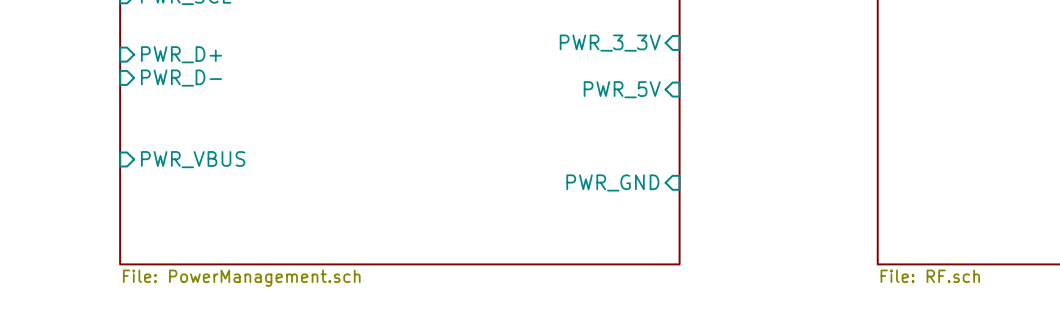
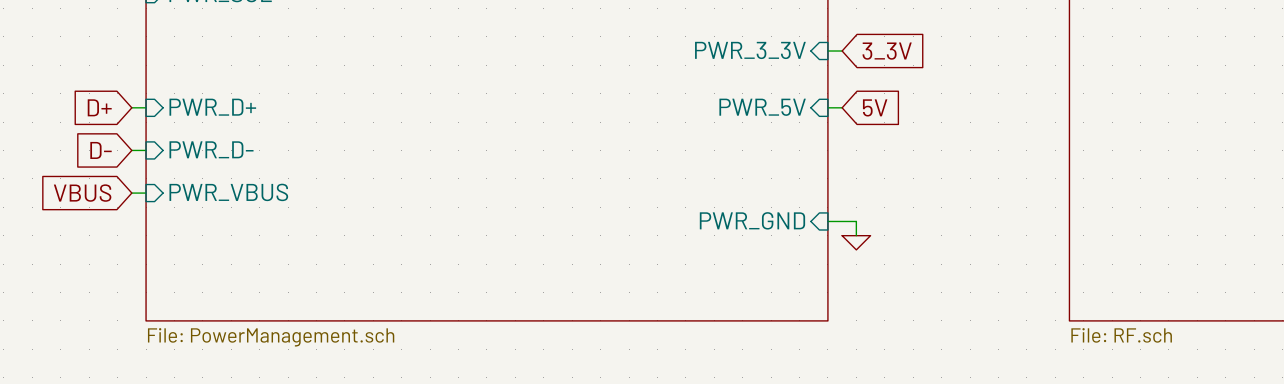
wire: none -> (827, 51) (842, 51)
global label: none -> 3_3V (887, 51)
sheet pin position: PWR_D+ (181, 54) -> PWR_D+ (212, 107)
sheet pin position: PWR_D- (181, 78) -> PWR_D- (211, 149)
global label: none -> D+ (99, 107)
wire: none -> (131, 107) (146, 107)
wire: none -> (827, 107) (842, 107)
global label: none -> 5V (875, 107)
global label: none -> D- (101, 150)
wire: none -> (131, 150) (146, 150)
global label: none -> VBUS (82, 193)
wire: none -> (131, 193) (146, 193)
wire: none -> (827, 221) (856, 221) (856, 235)
power symbol: none -> (856, 242)

